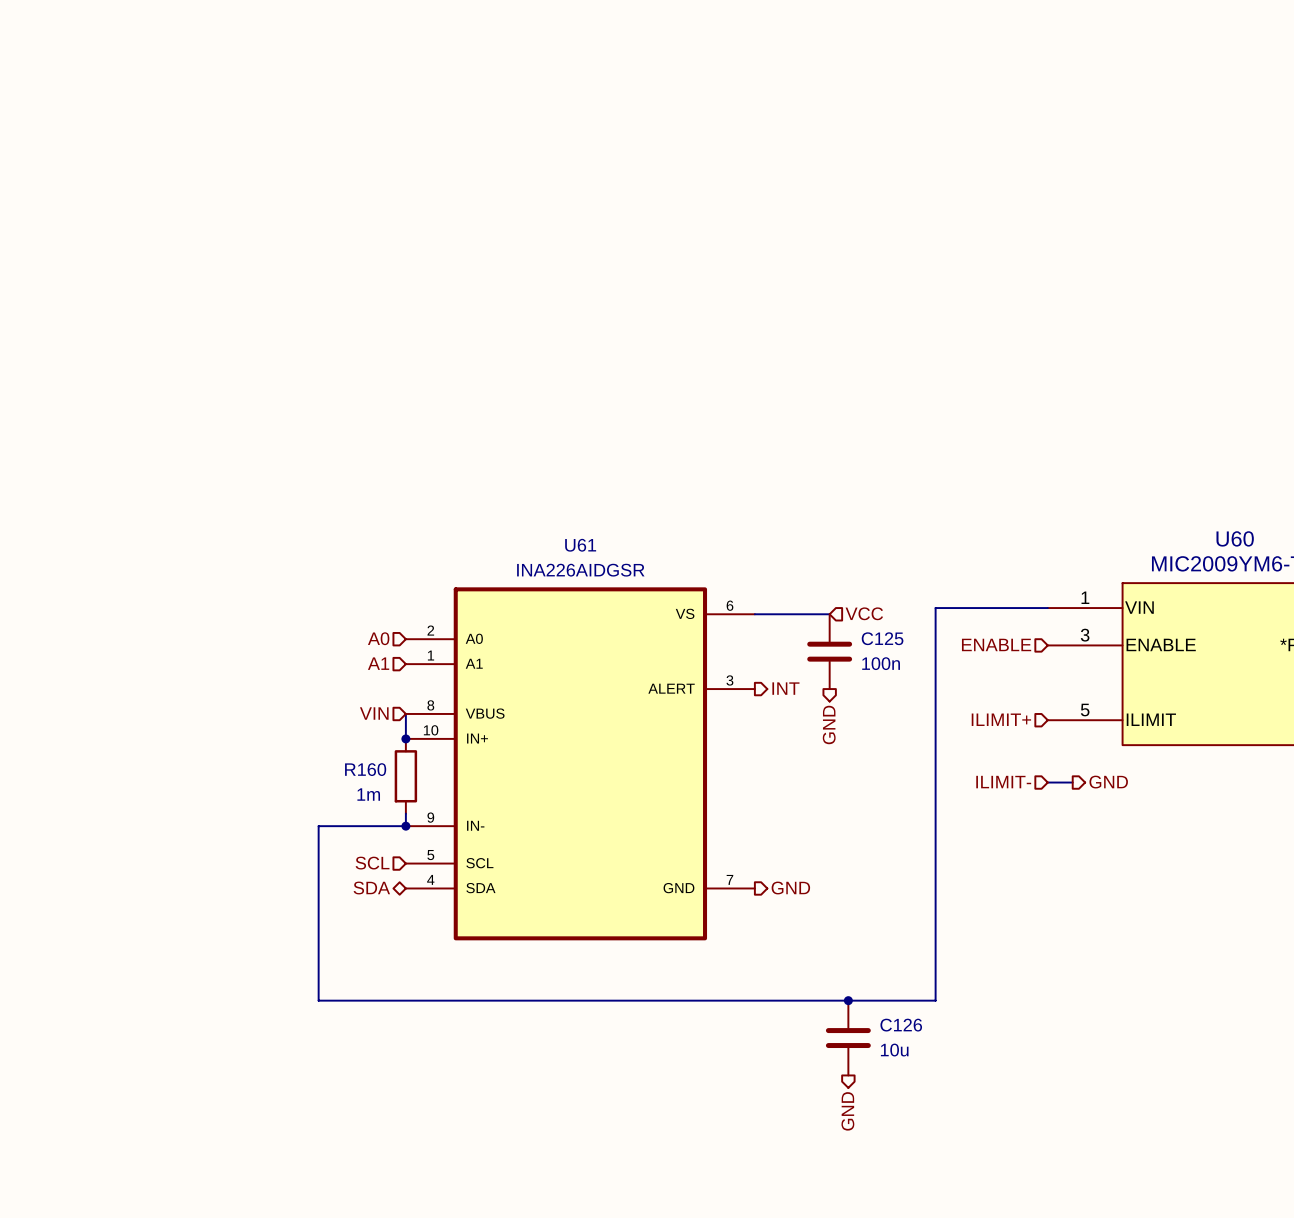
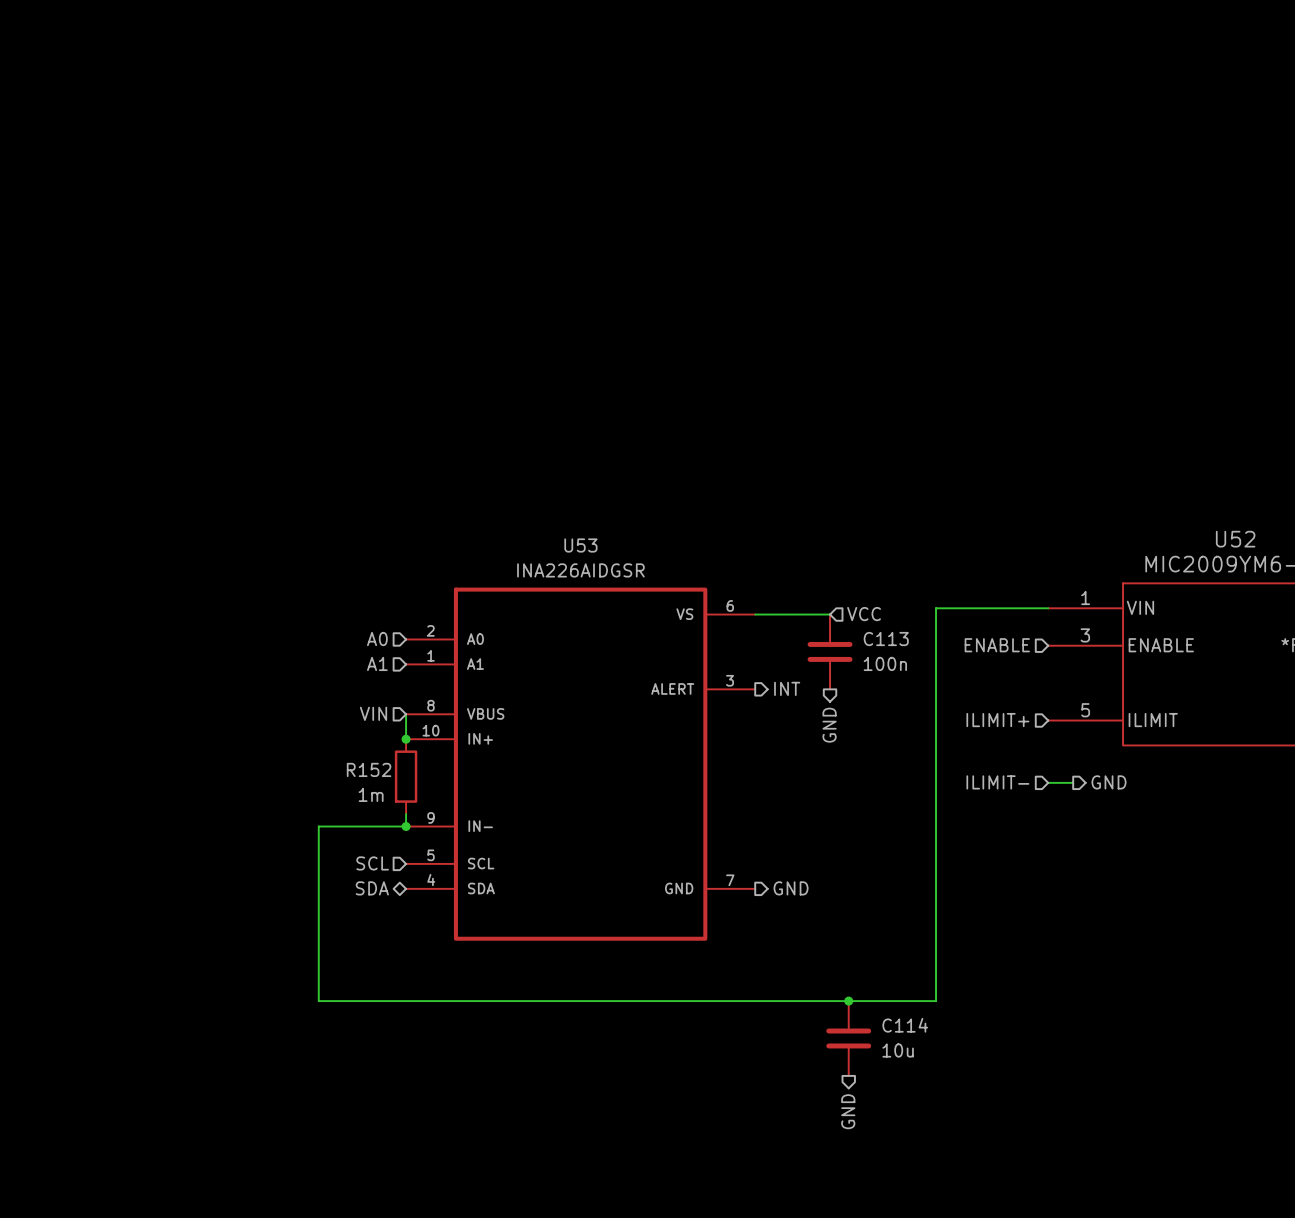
U60 name: U60 (1235, 538) -> U52 (1235, 539)
U61 name: U61 (580, 545) -> U53 (580, 545)
C125 name: C125 (882, 638) -> C113 (886, 639)
R160 name: R160 (365, 769) -> R152 (369, 769)
C126 name: C126 (901, 1025) -> C114 (905, 1025)

